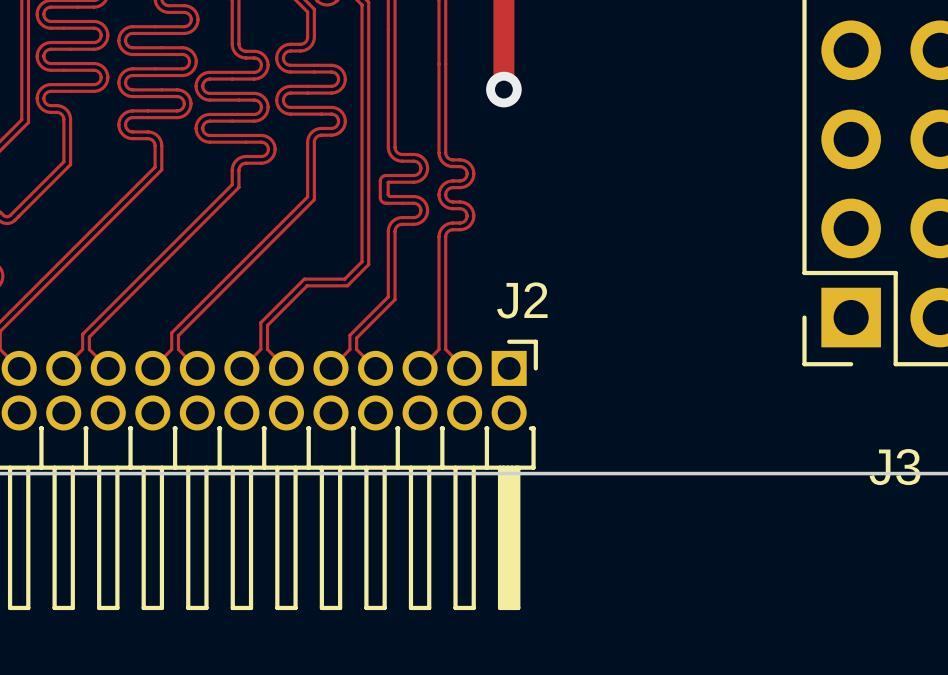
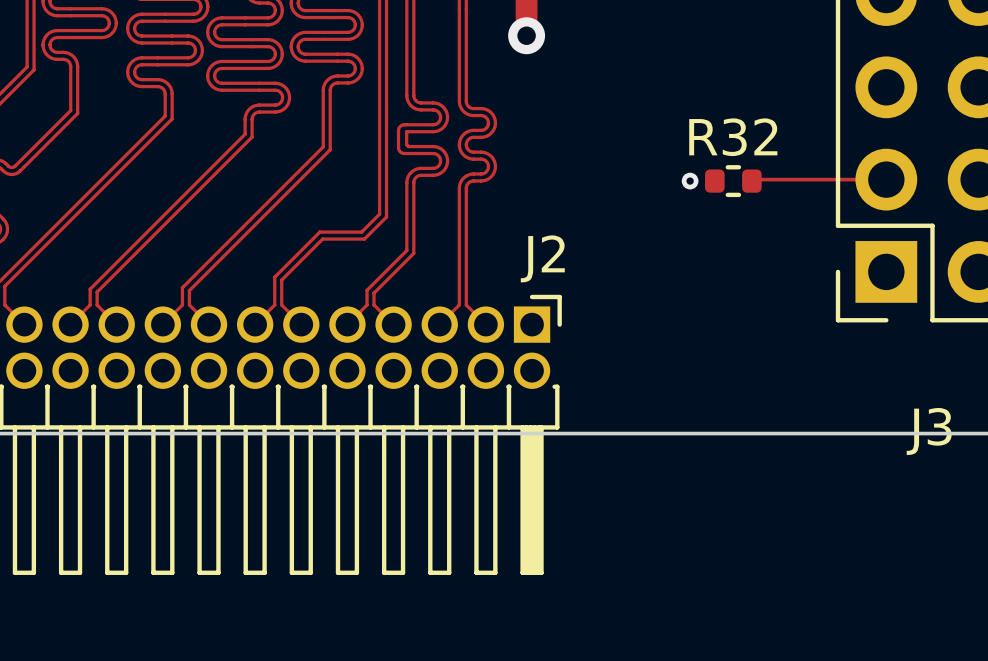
track: none -> (886, 179) (751, 181)
via: none -> (690, 181)
R32: none -> (733, 181)

